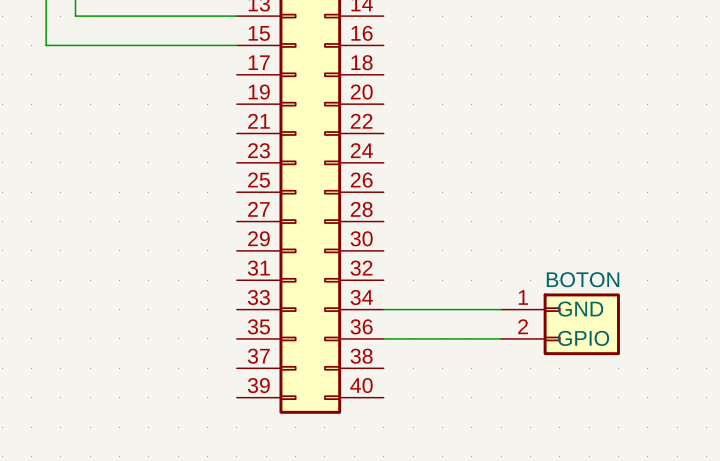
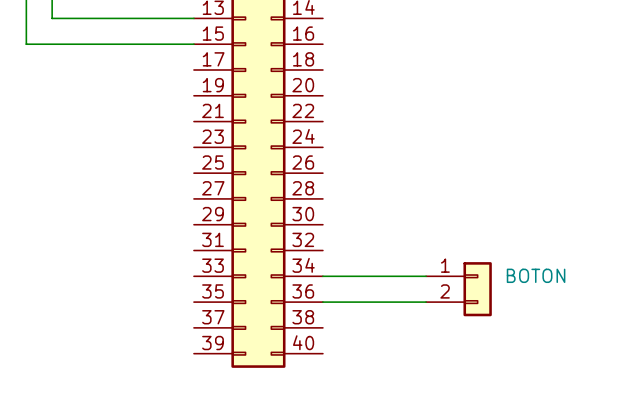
BOTON: none -> (458, 289)
BOTON: (560, 324) -> none

